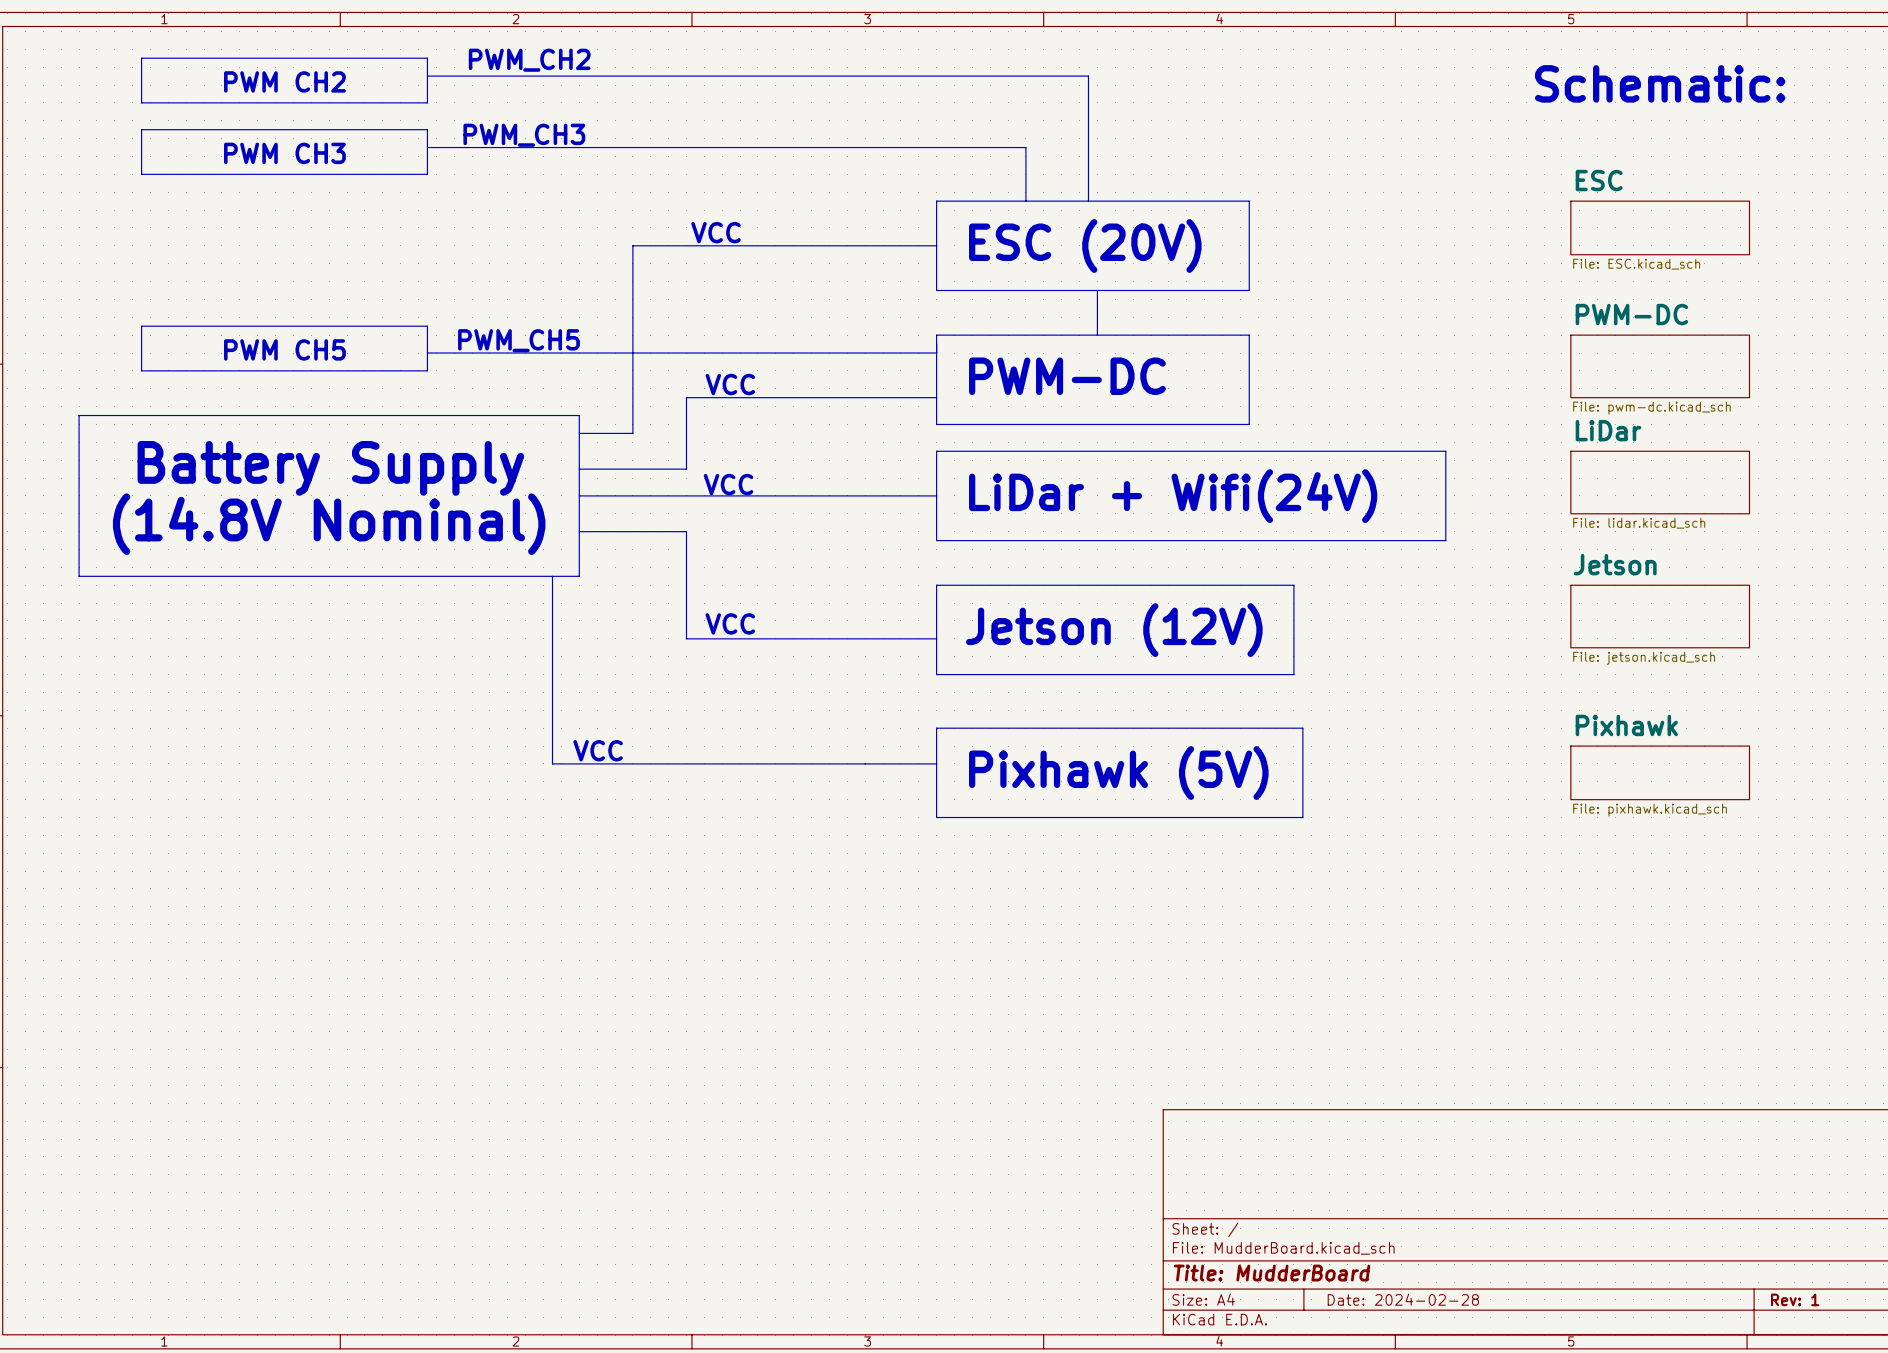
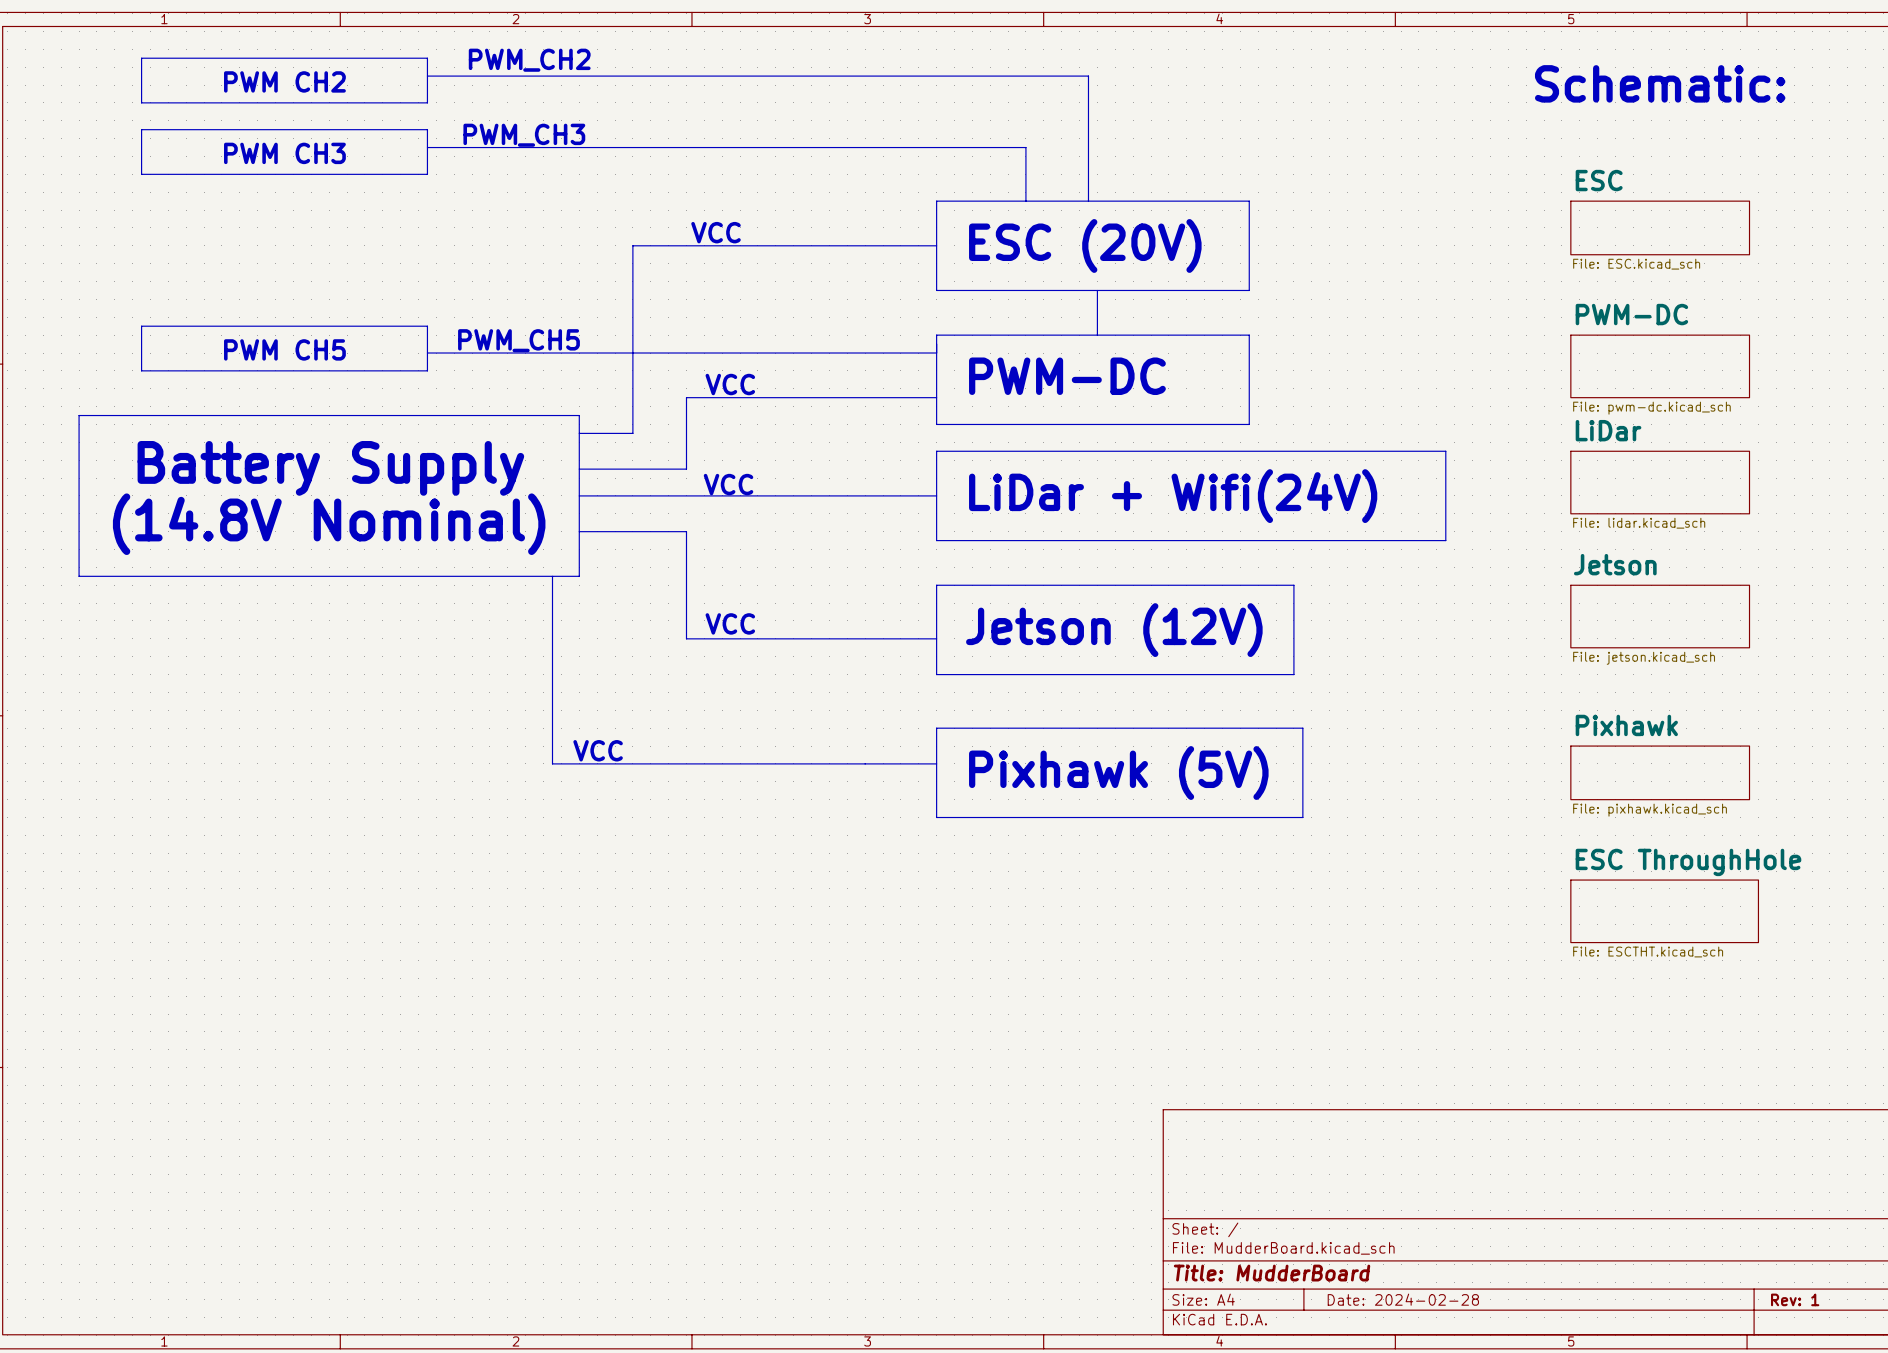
sheet ESC ThroughHole: none -> File: ESCTHT.kicad_sch (1664, 911)

